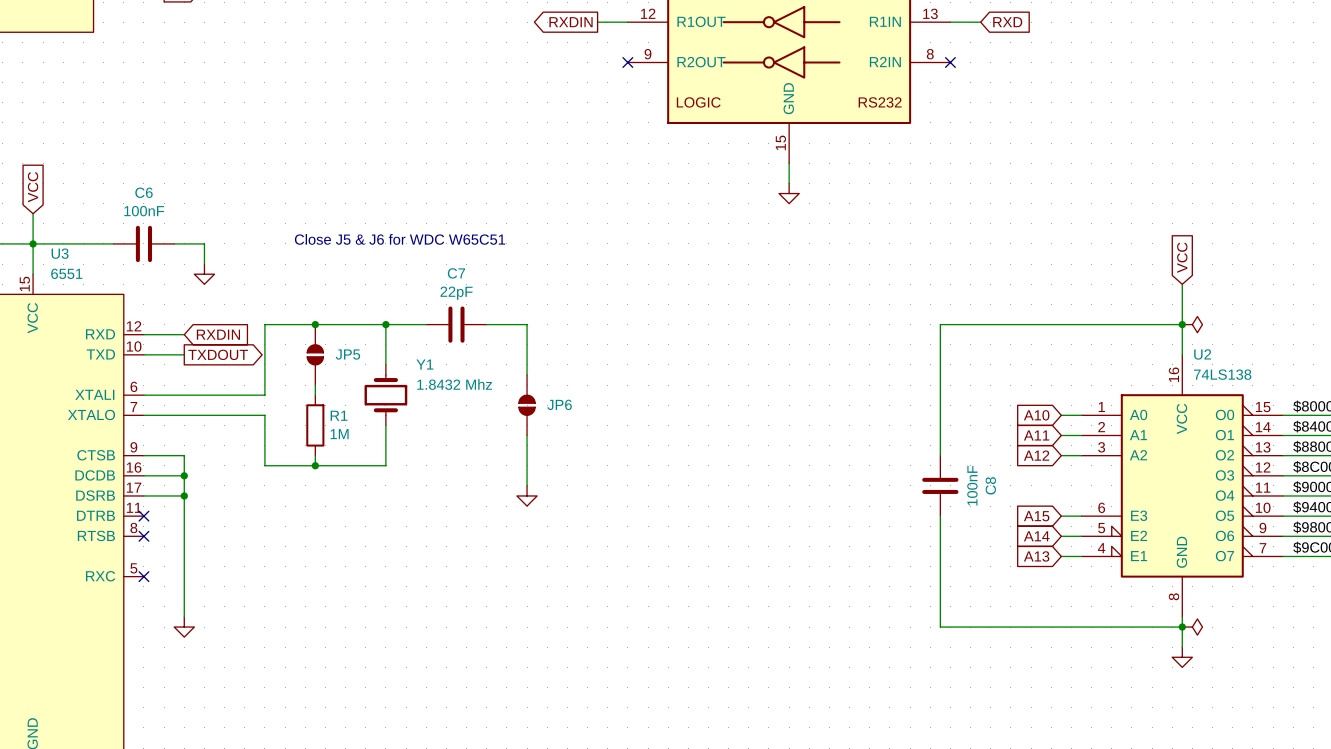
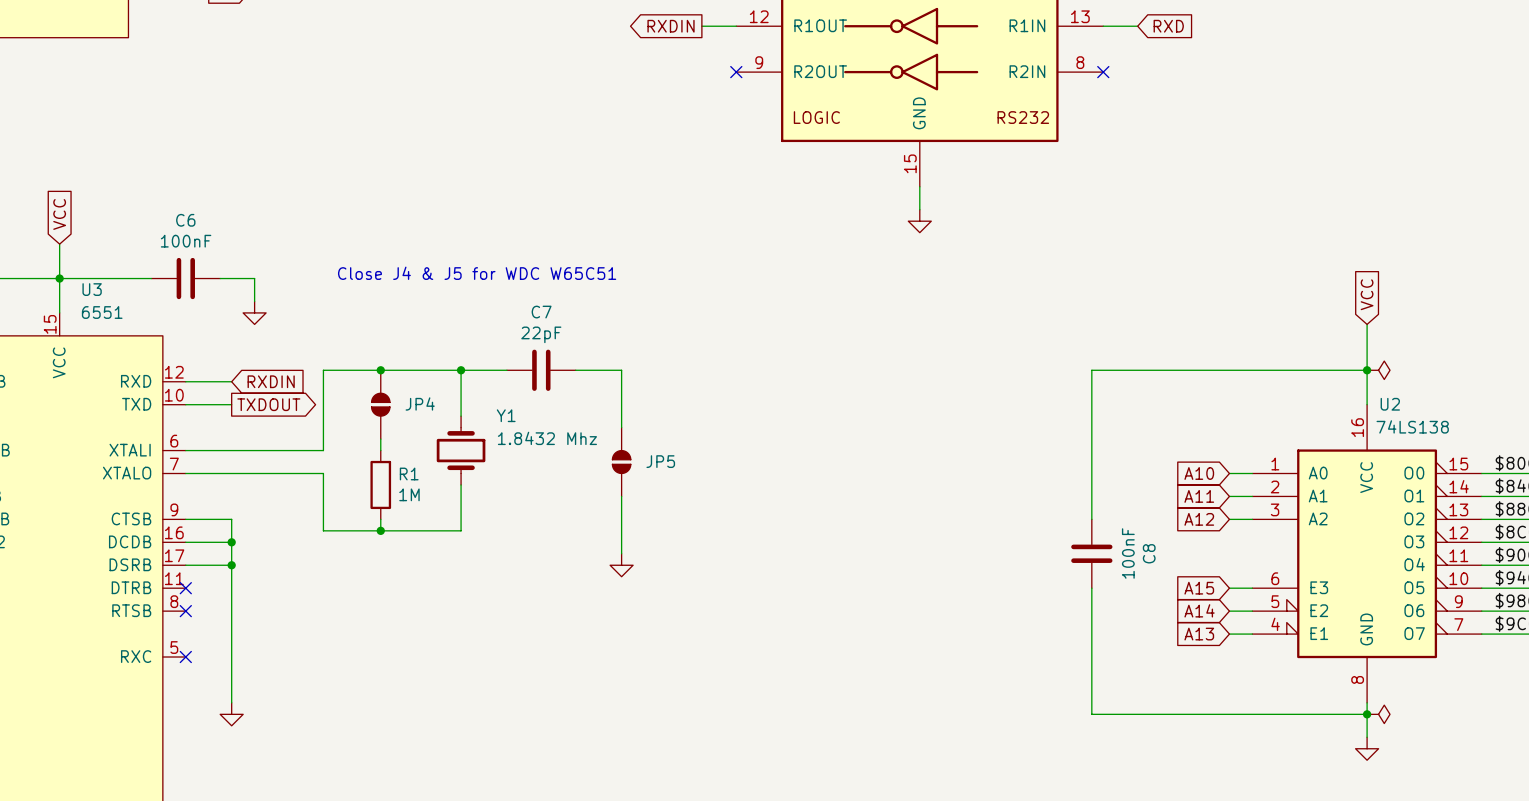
text: Close J5 & J6 for WDC W65C51 (400, 239) -> Close J4 & J5 for WDC W65C51 (477, 273)
JP5 name: JP5 (347, 354) -> JP4 (420, 403)
JP6 name: JP6 (559, 404) -> JP5 (660, 461)

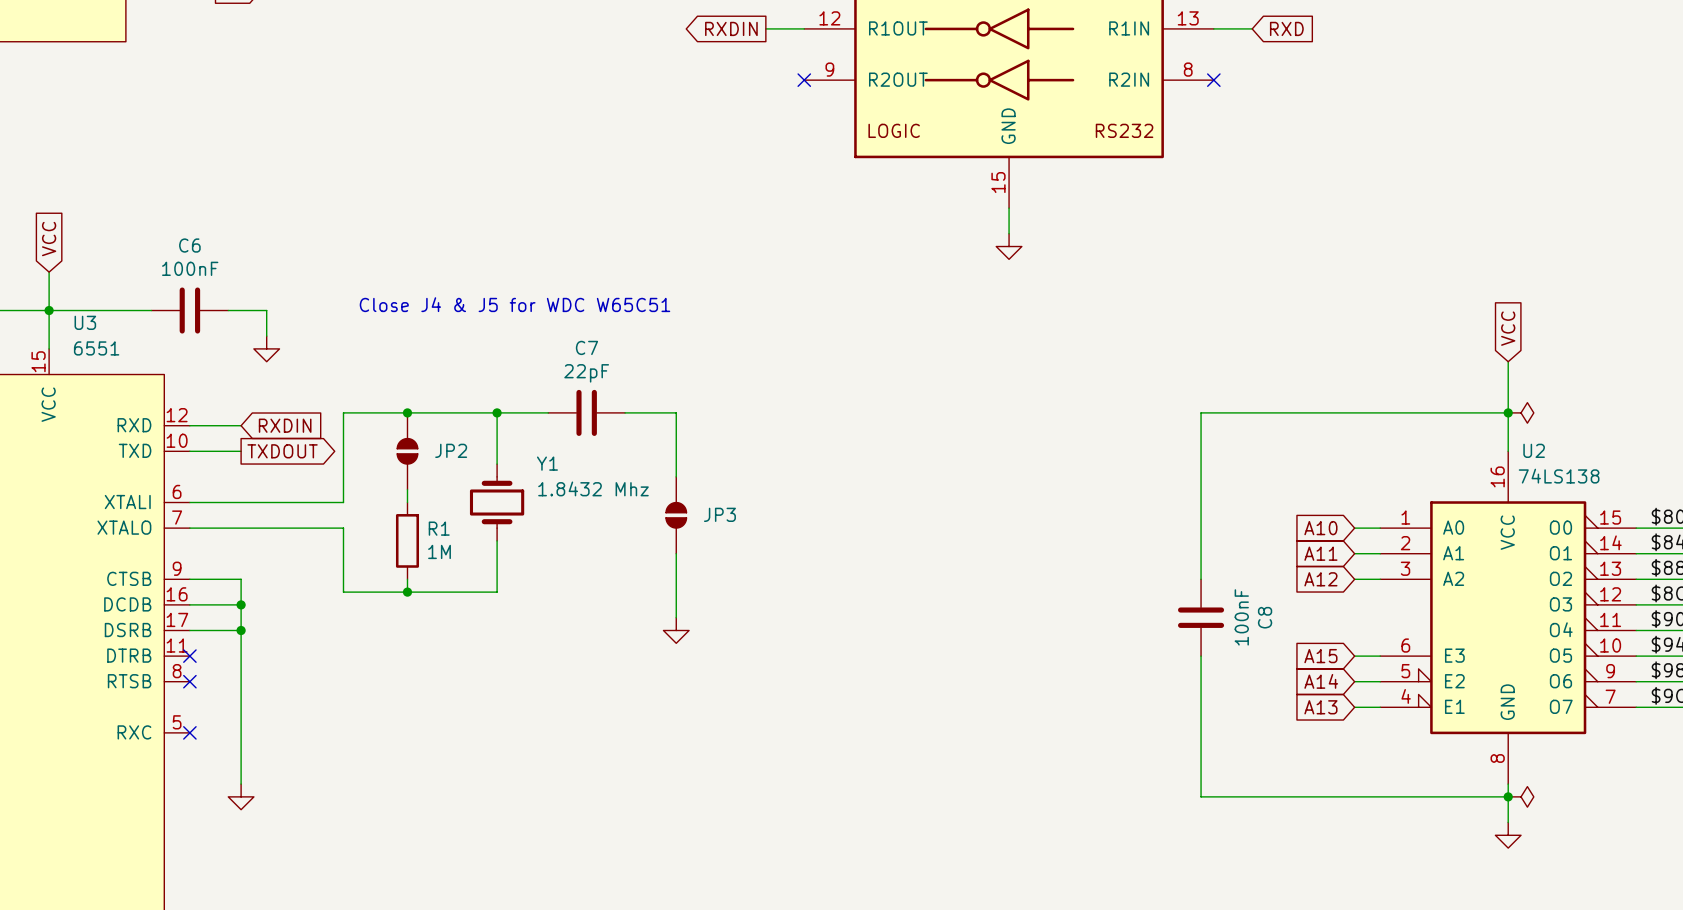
JP4 name: JP4 (420, 403) -> JP2 (451, 450)
JP5 name: JP5 (660, 461) -> JP3 (719, 514)

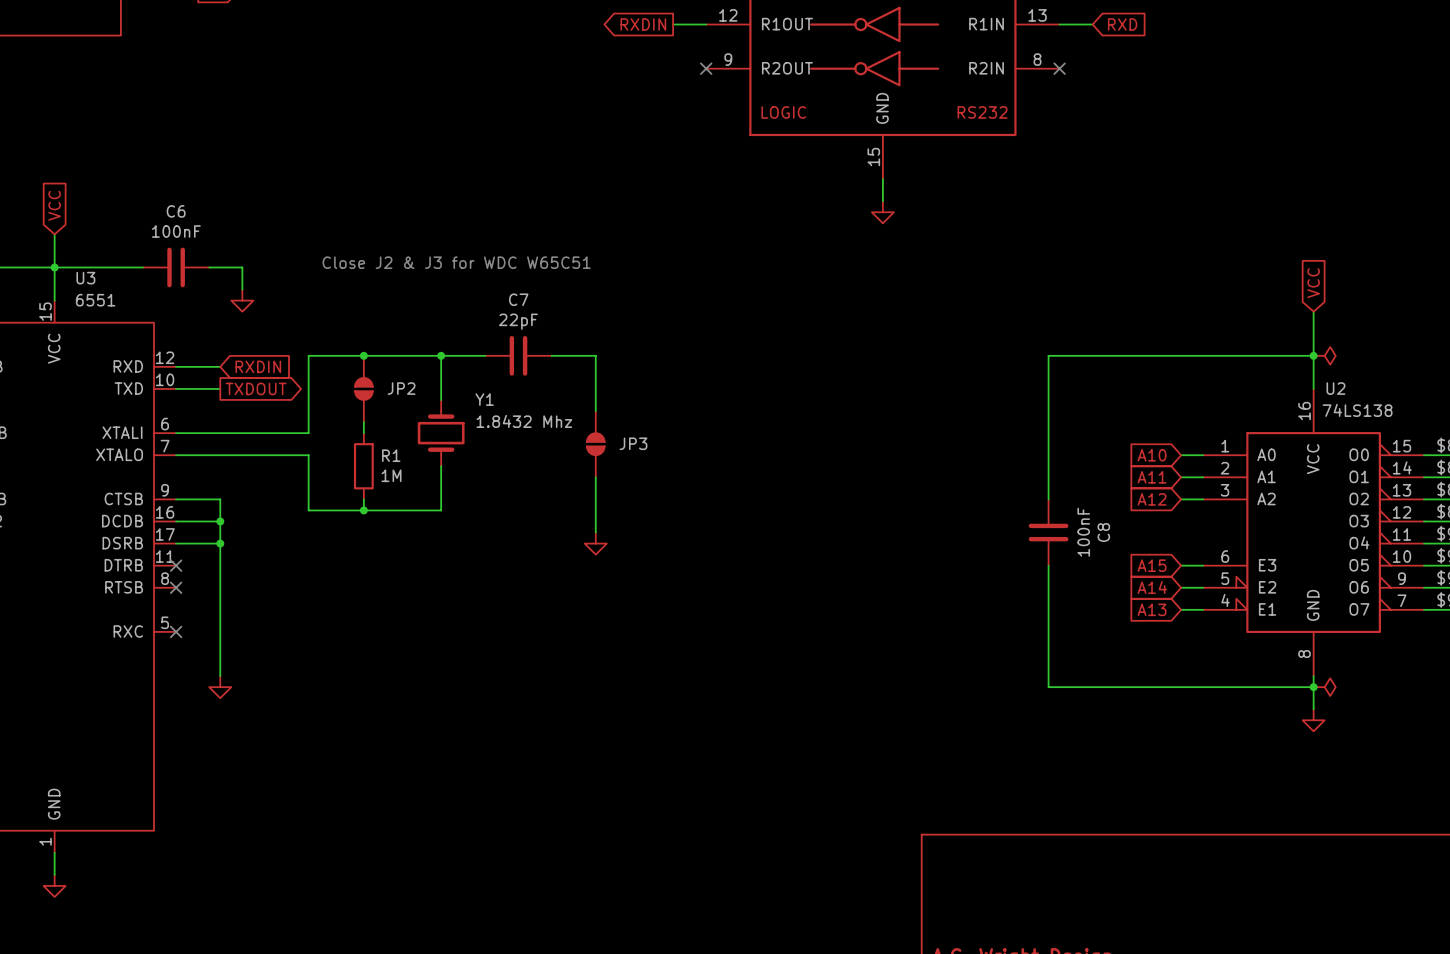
text: Close J4 & J5 for WDC W65C51 (515, 304) -> Close J2 & J3 for WDC W65C51 (456, 262)

